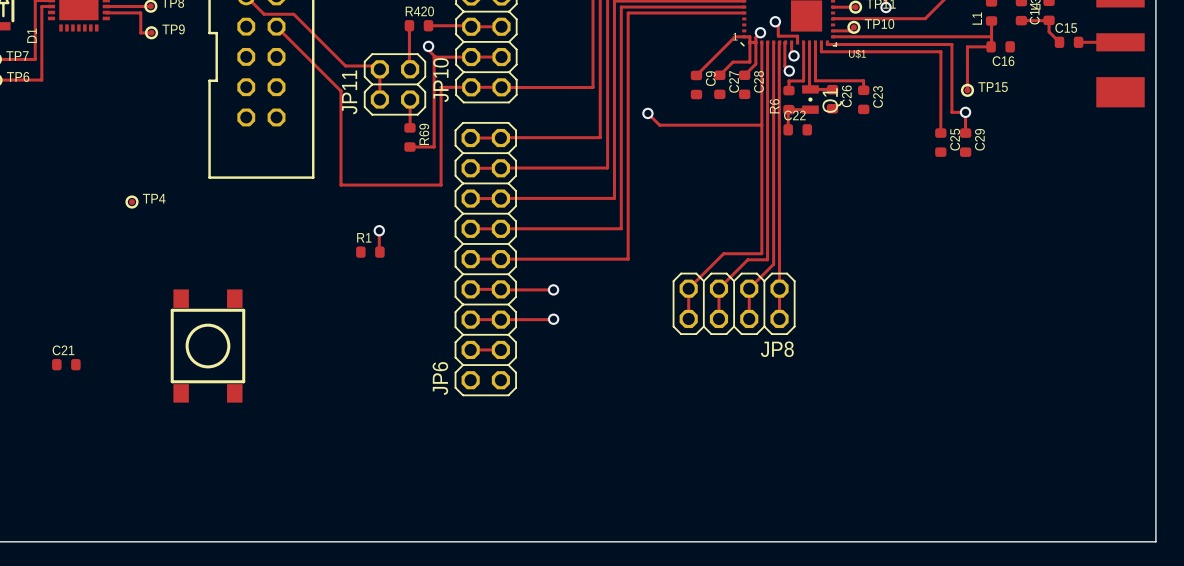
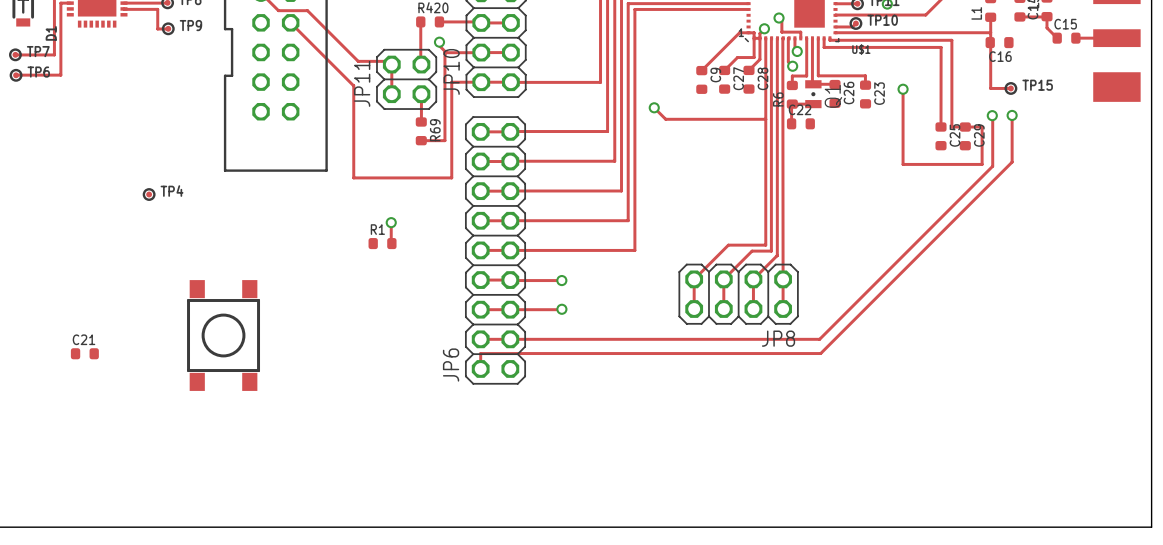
track: (991, 46) (967, 46) (967, 90) -> none
track: none -> (990, 42) (990, 88) (1010, 88)
TP15 position: (967, 90) -> (1010, 88)
via: none -> (903, 89)
track: (951, 112) (965, 112) (965, 133) -> (951, 106) (951, 127) (982, 127) (982, 164) (903, 164) (903, 89)
via: (965, 112) -> none
track: none -> (992, 115) (992, 166) (819, 339) (510, 339)
via: none -> (992, 115)
track: none -> (1012, 115) (1012, 162) (820, 353) (480, 353) (480, 368)
via: none -> (1012, 115)

